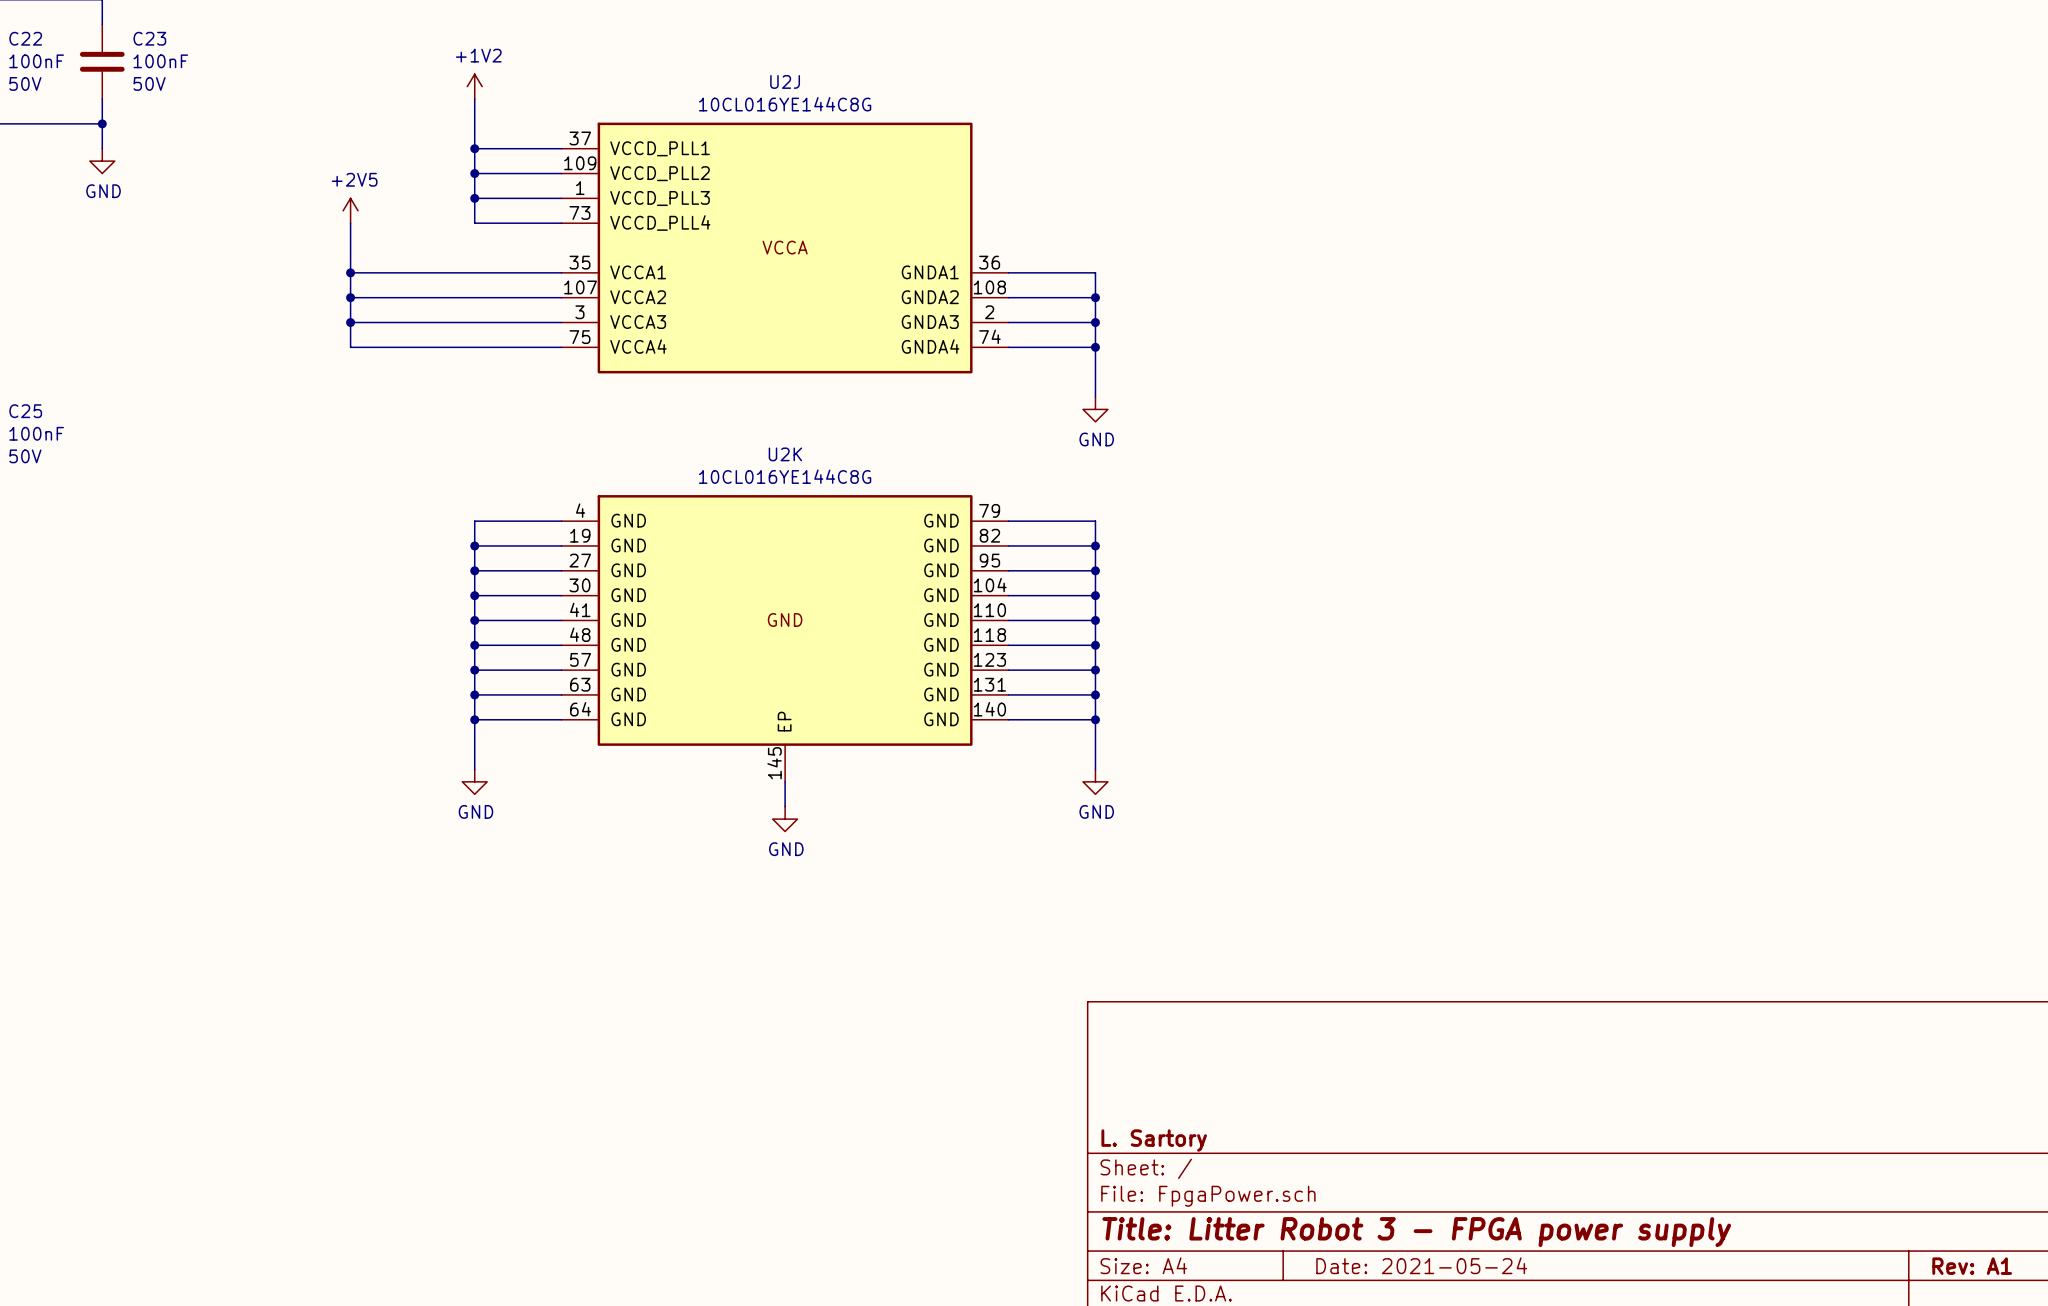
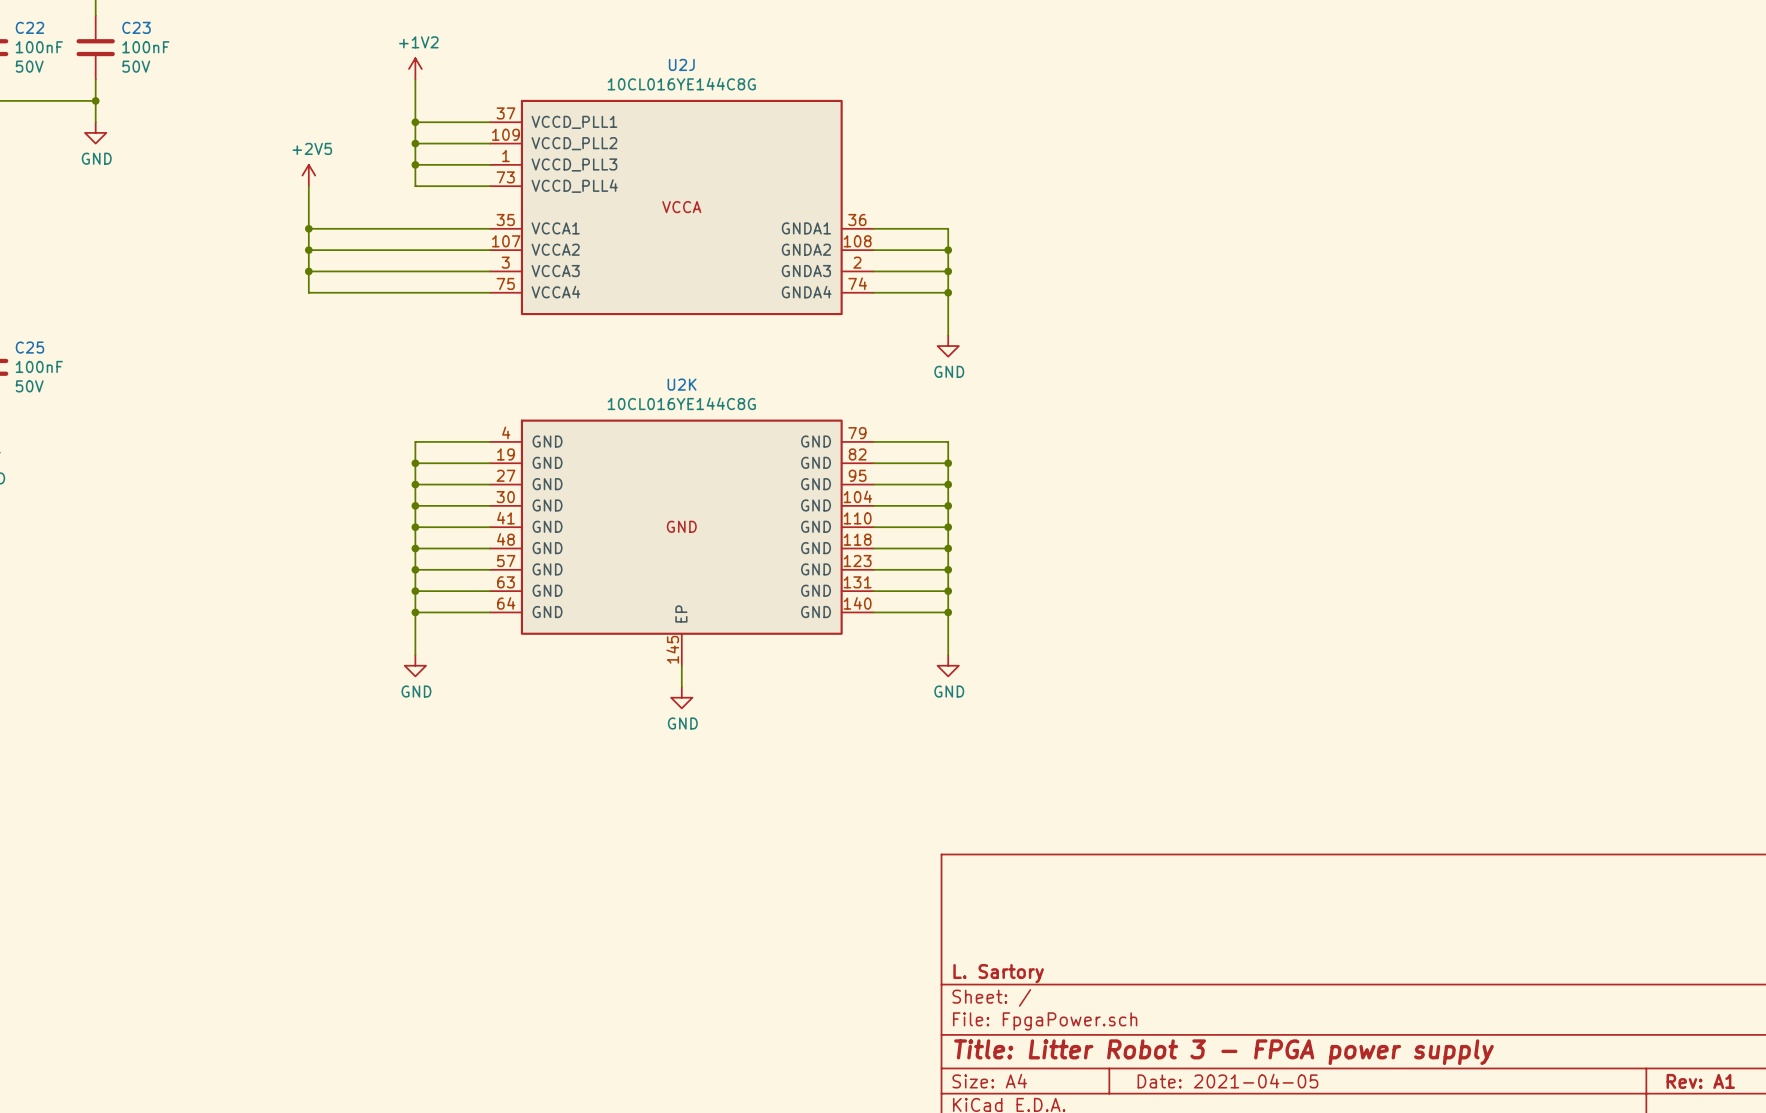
title block: Date: 2021-05-24 (1421, 1265) -> Date: 2021-04-05 (1227, 1081)

